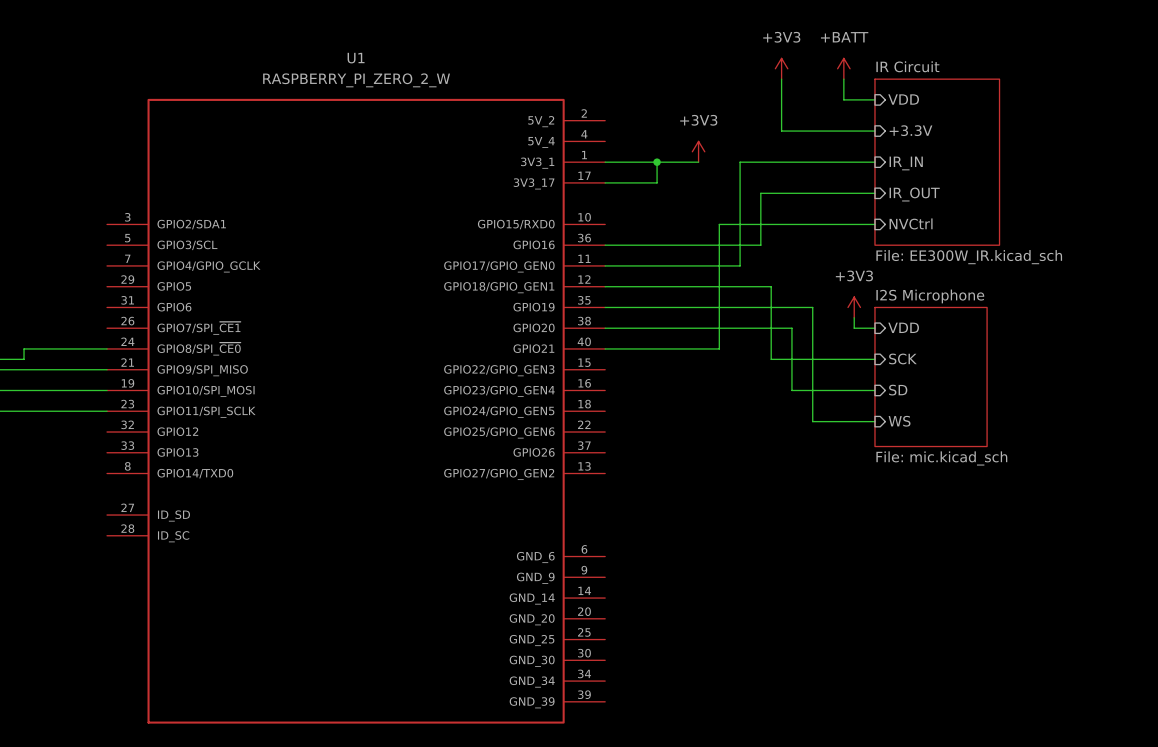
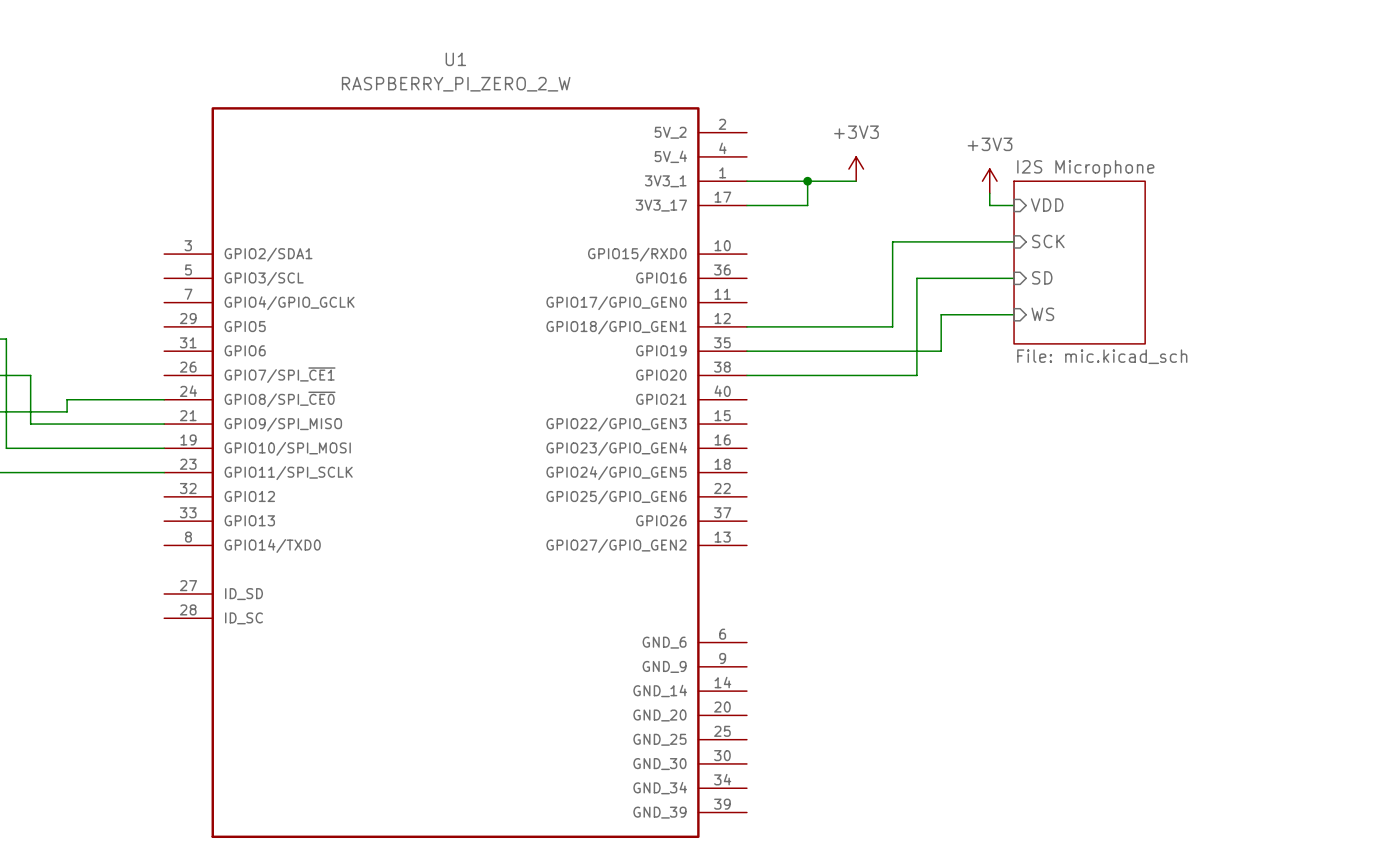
power symbol: +3V3 (781, 68) -> none
power symbol: +BATT (843, 68) -> none
wire: (781, 79) (781, 131) (874, 131) -> none
wire: (843, 79) (843, 99) (874, 99) -> none
sheet pin: VDD (903, 99) -> none
sheet pin: +3.3V (911, 130) -> none
power symbol: none -> +3V3 (989, 181)
wire: (874, 162) (740, 162) (740, 265) (605, 265) -> none
sheet IR Circuit: File: EE300W_IR.kicad_sch (937, 162) -> none
sheet pin: IR_IN (906, 163) -> none
sheet pin: none -> VDD (1047, 205)
wire: (874, 193) (760, 193) (760, 245) -> (1014, 278) (929, 278)
sheet pin: IR_OUT (914, 194) -> none
sheet pin: NVCtrl (911, 223) -> none
wire: (874, 224) (719, 224) (719, 348) (605, 348) -> none
wire: (605, 245) (750, 245) -> (916, 375) (916, 278)
wire: none -> (1014, 314) (941, 314) (941, 326)
wire: (729, 286) (771, 286) -> (892, 326) (892, 241) (1014, 241)
power symbol: +3V3 (854, 307) -> none
wire: (854, 317) (854, 328) (874, 328) -> (989, 193) (989, 205) (1014, 205)
sheet pin: VDD (903, 327) -> none
wire: (750, 328) (791, 328) (791, 390) (874, 390) -> none
sheet pin position: SCK (902, 358) -> SCK (1048, 241)
wire: (874, 359) (771, 359) (771, 307) (812, 307) (812, 421) (874, 421) -> none
sheet I2S Microphone position: (931, 377) -> (1079, 262)
sheet pin position: SD (898, 390) -> SD (1042, 277)
sheet pin position: WS (899, 421) -> WS (1042, 314)

